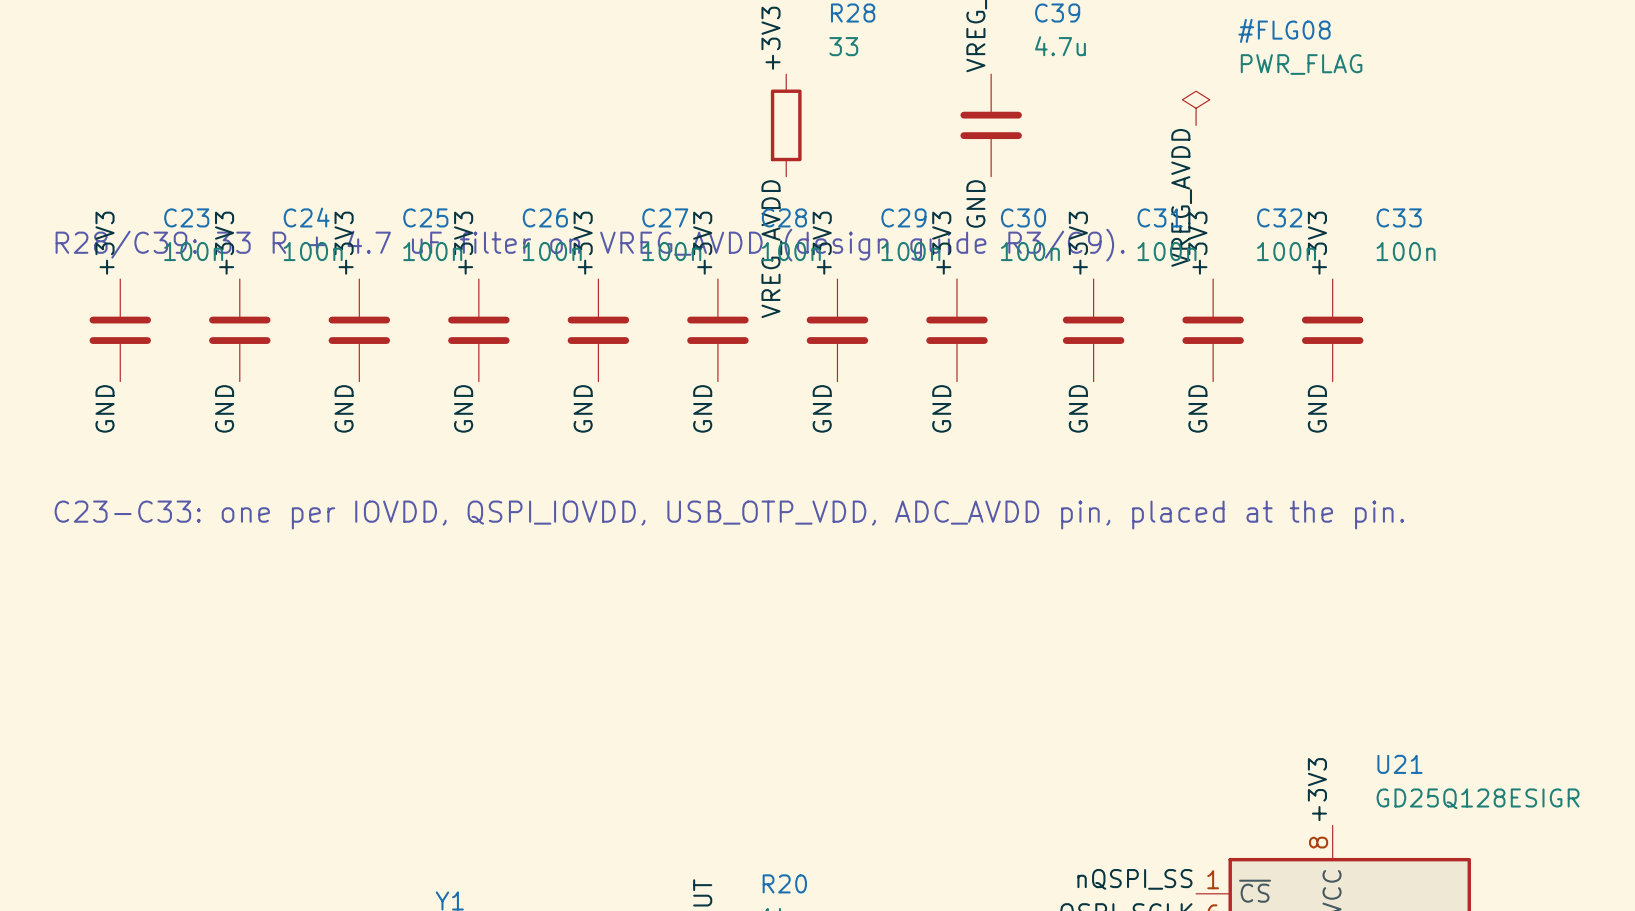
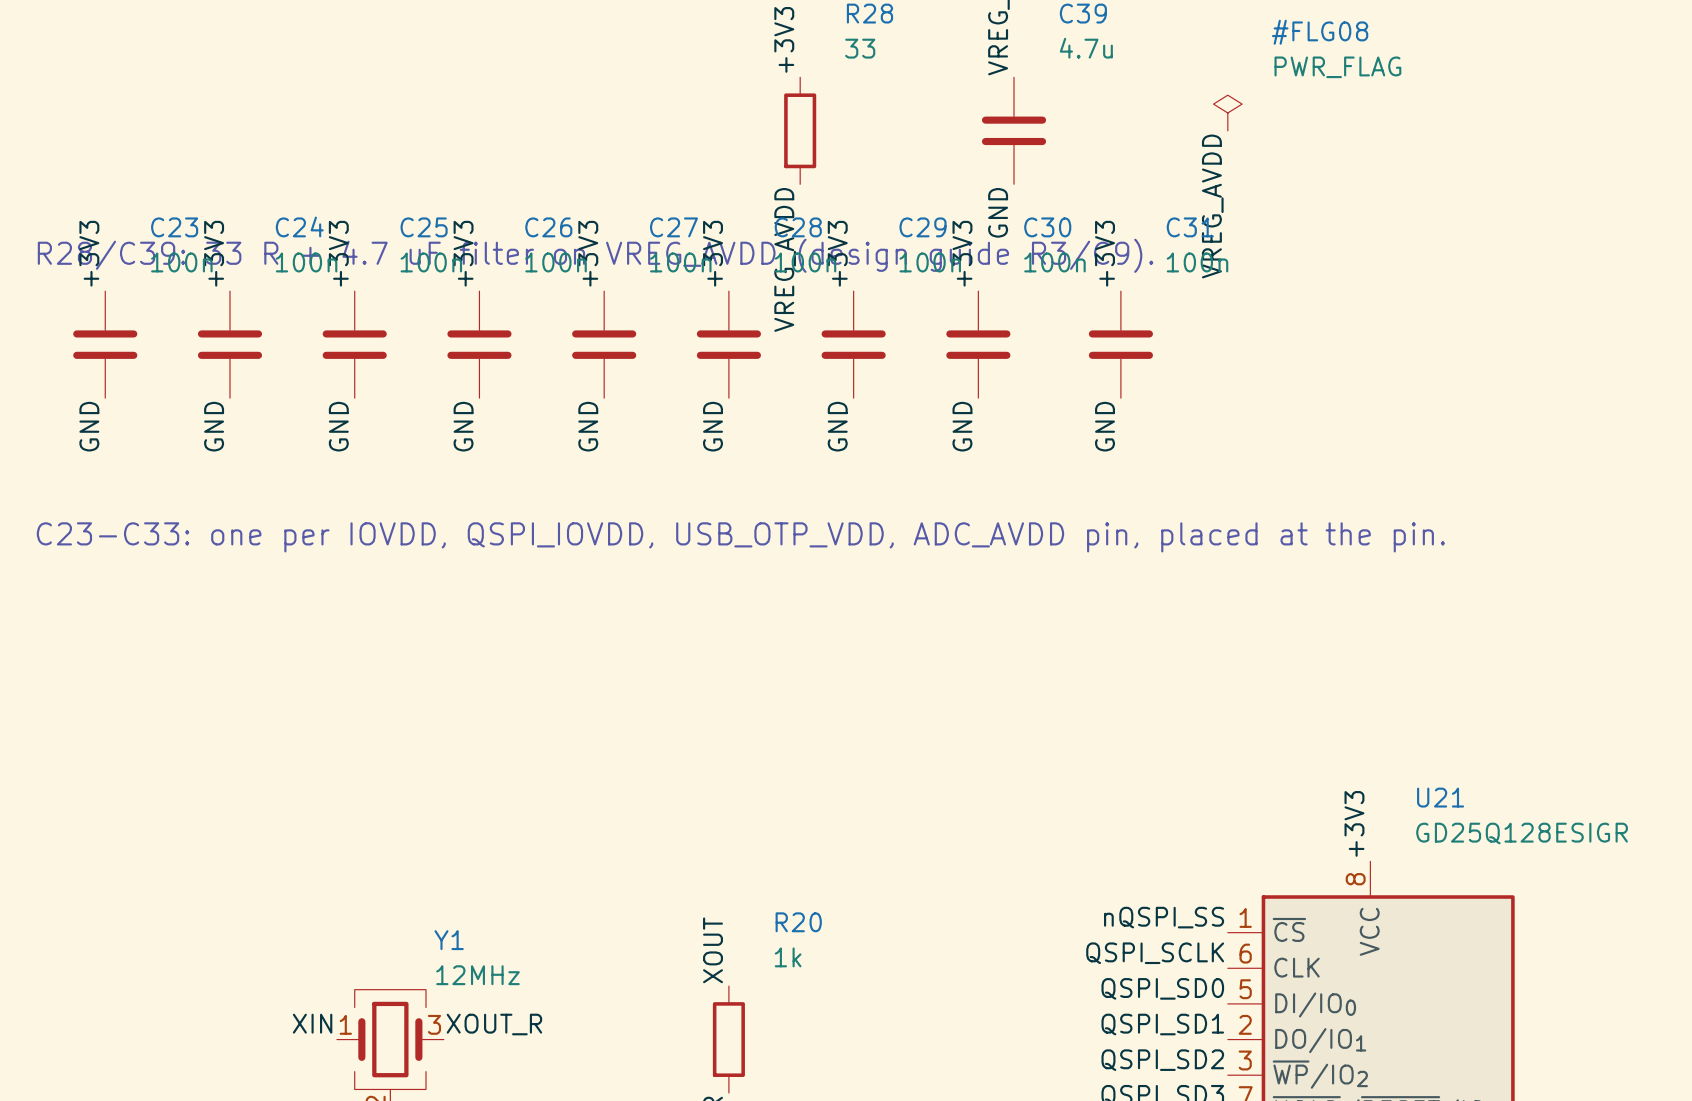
label: +3V3 (1197, 243) -> none
label: +3V3 (1317, 243) -> none
C32: 100n (1213, 330) -> none
C33: 100n (1332, 330) -> none
label: GND (1197, 408) -> none
label: GND (1317, 408) -> none

